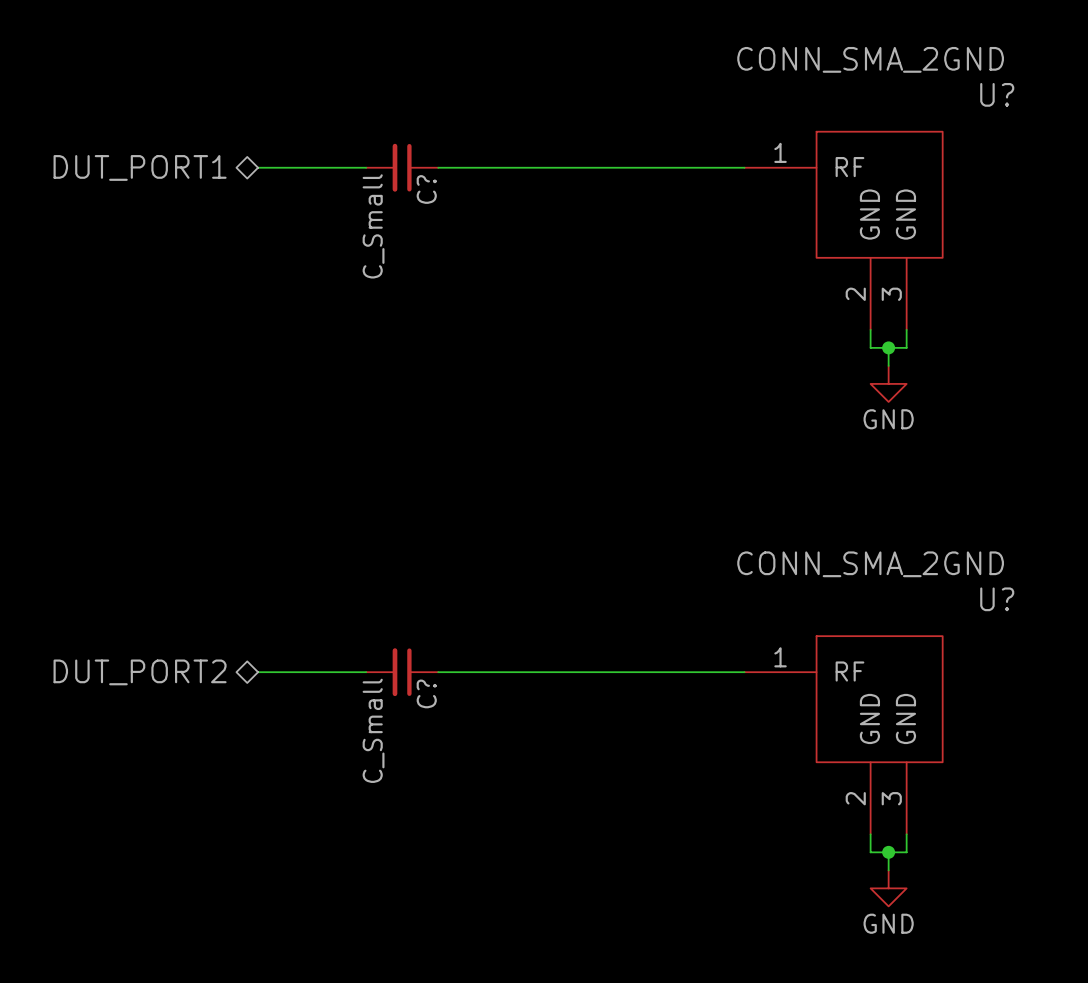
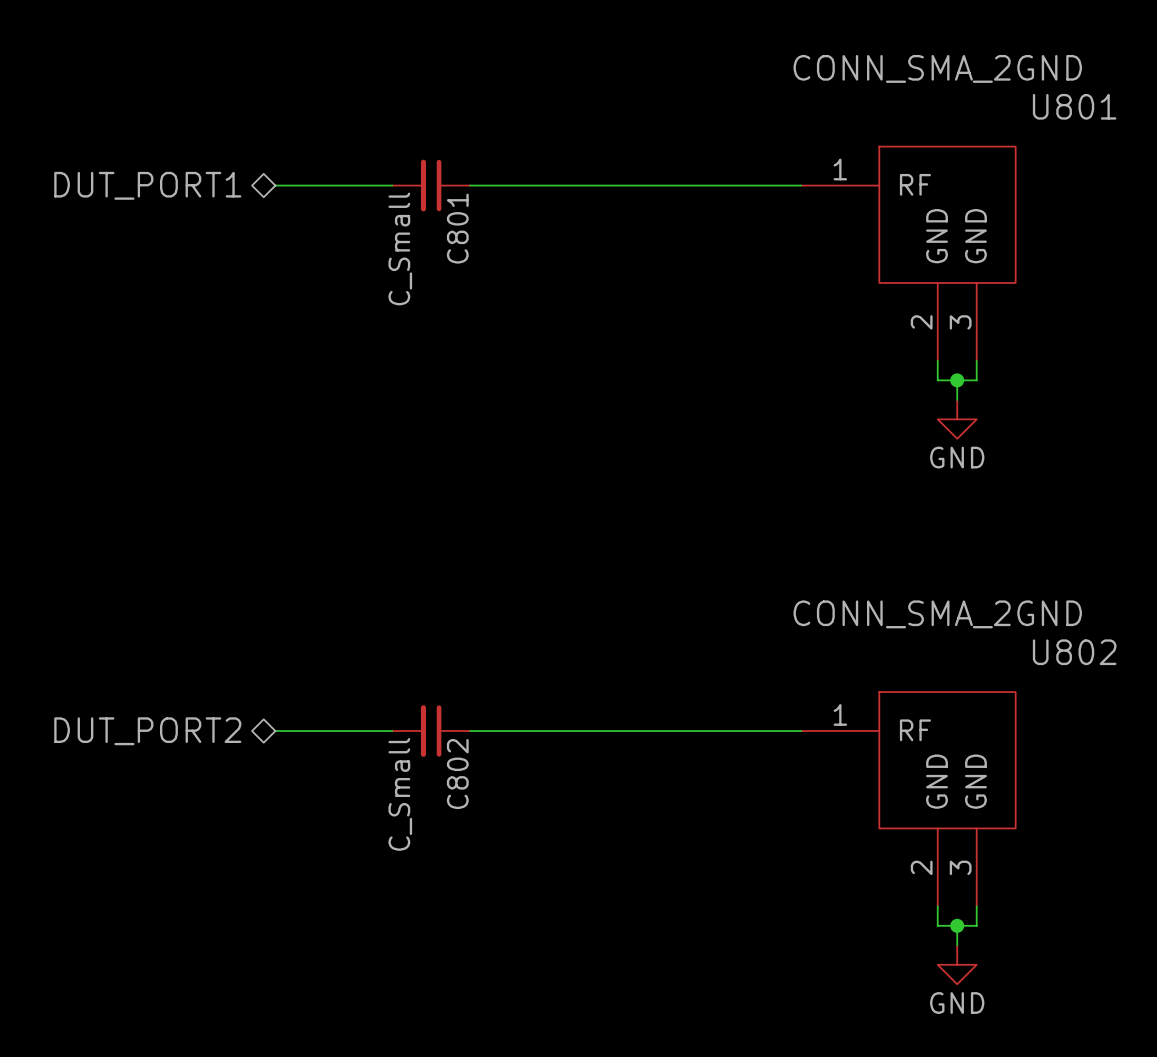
U? name: U? (997, 94) -> U801 (1074, 106)
C? name: C? (426, 189) -> C801 (457, 228)
U? name: U? (997, 599) -> U802 (1074, 652)
C? name: C? (426, 693) -> C802 (457, 774)

